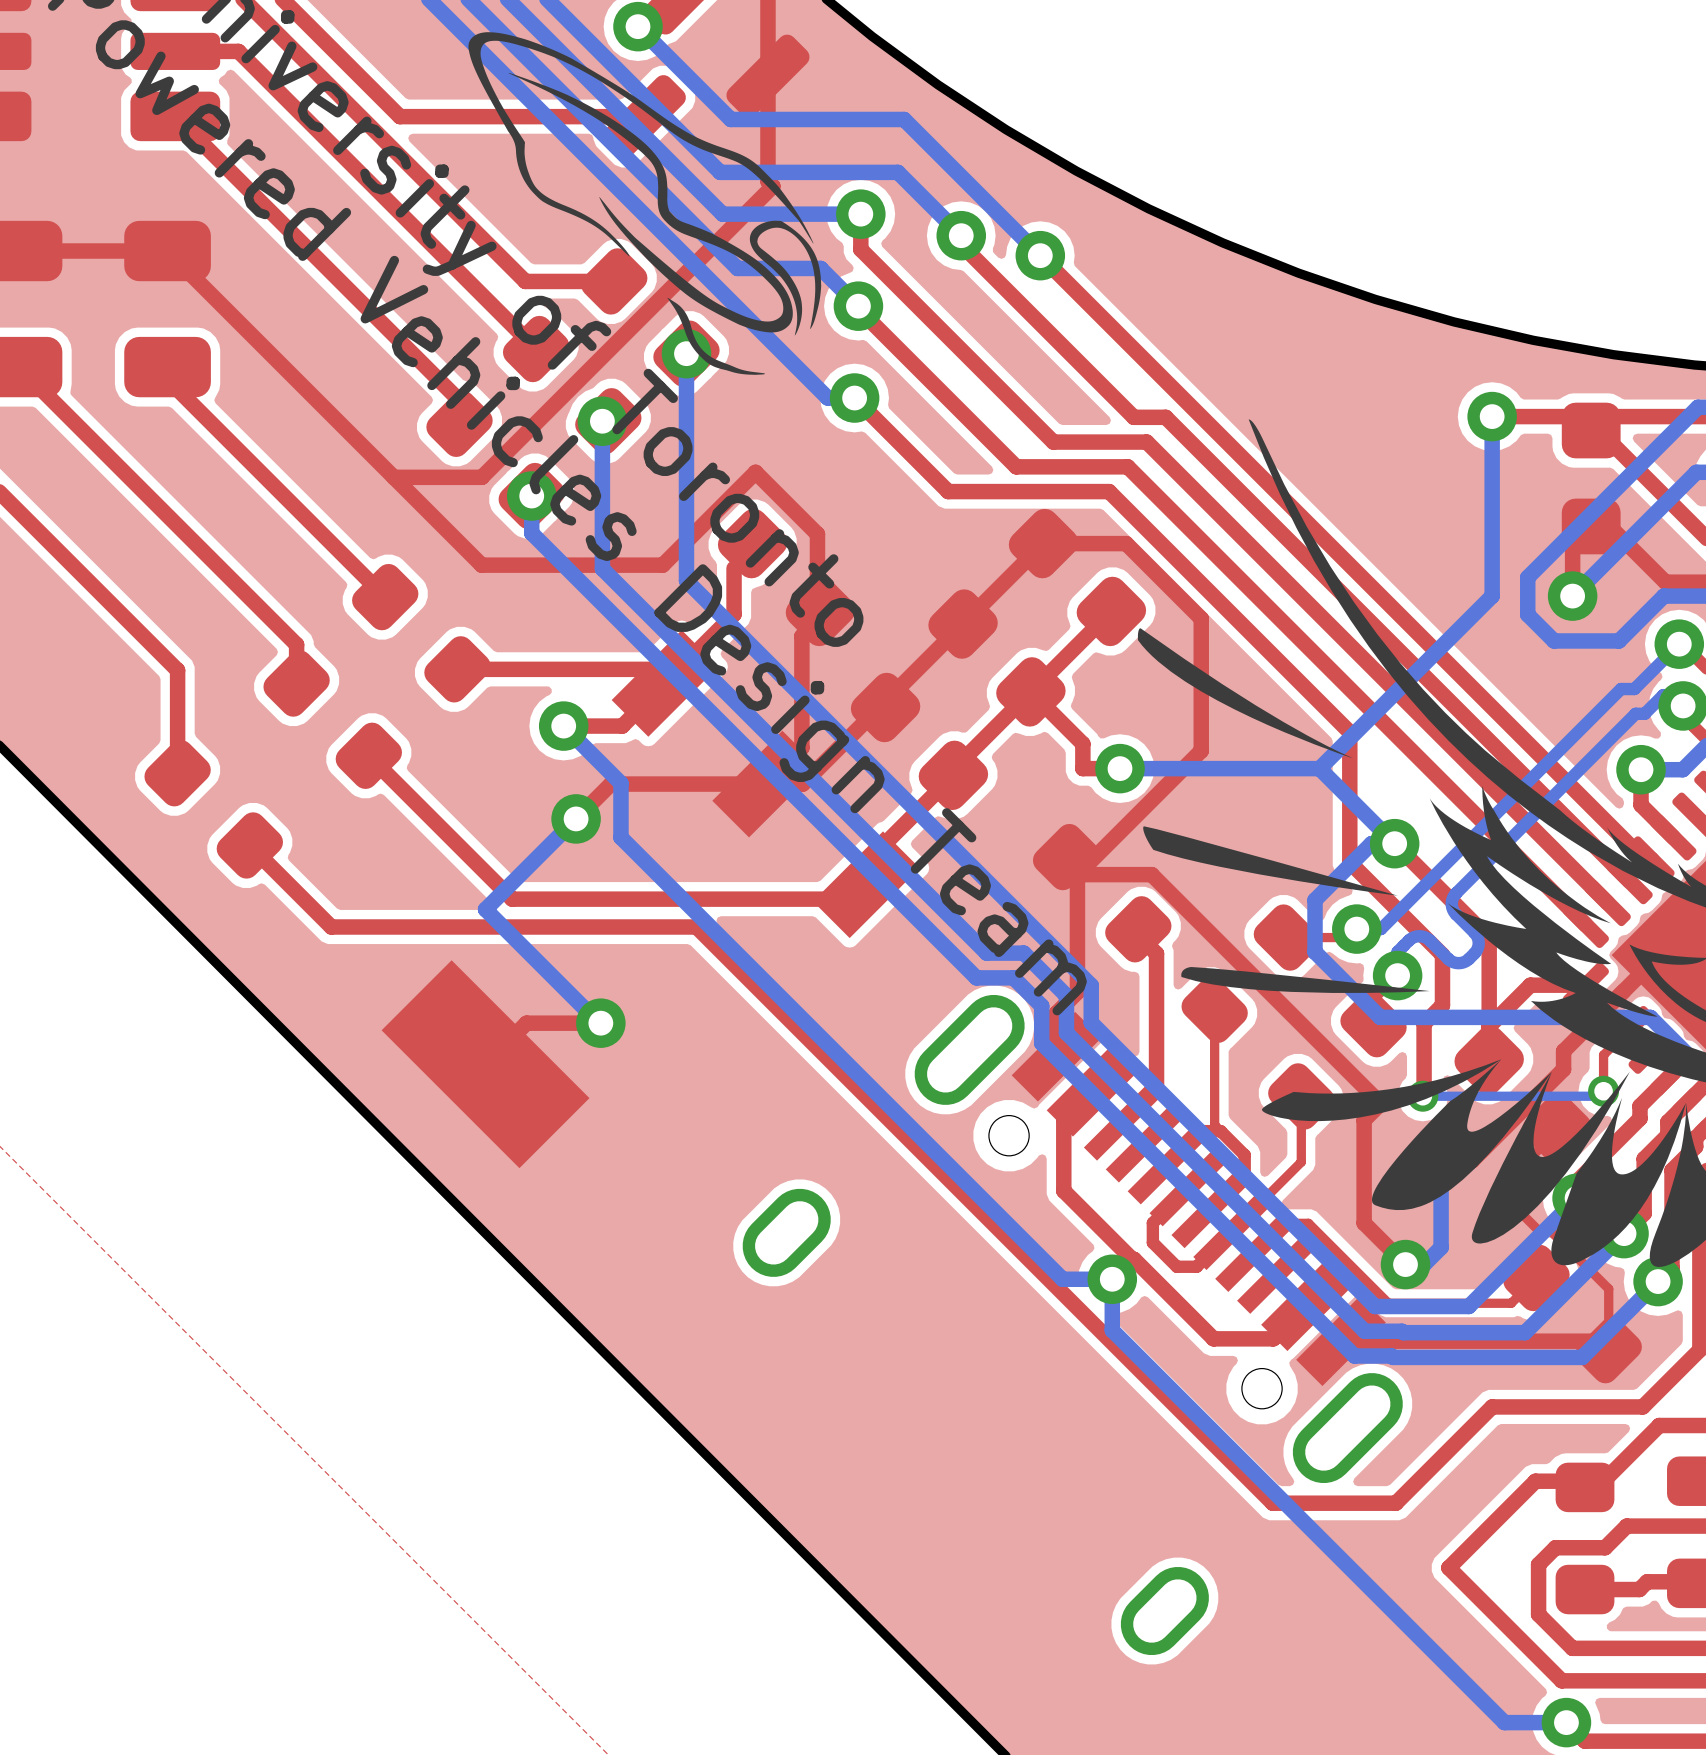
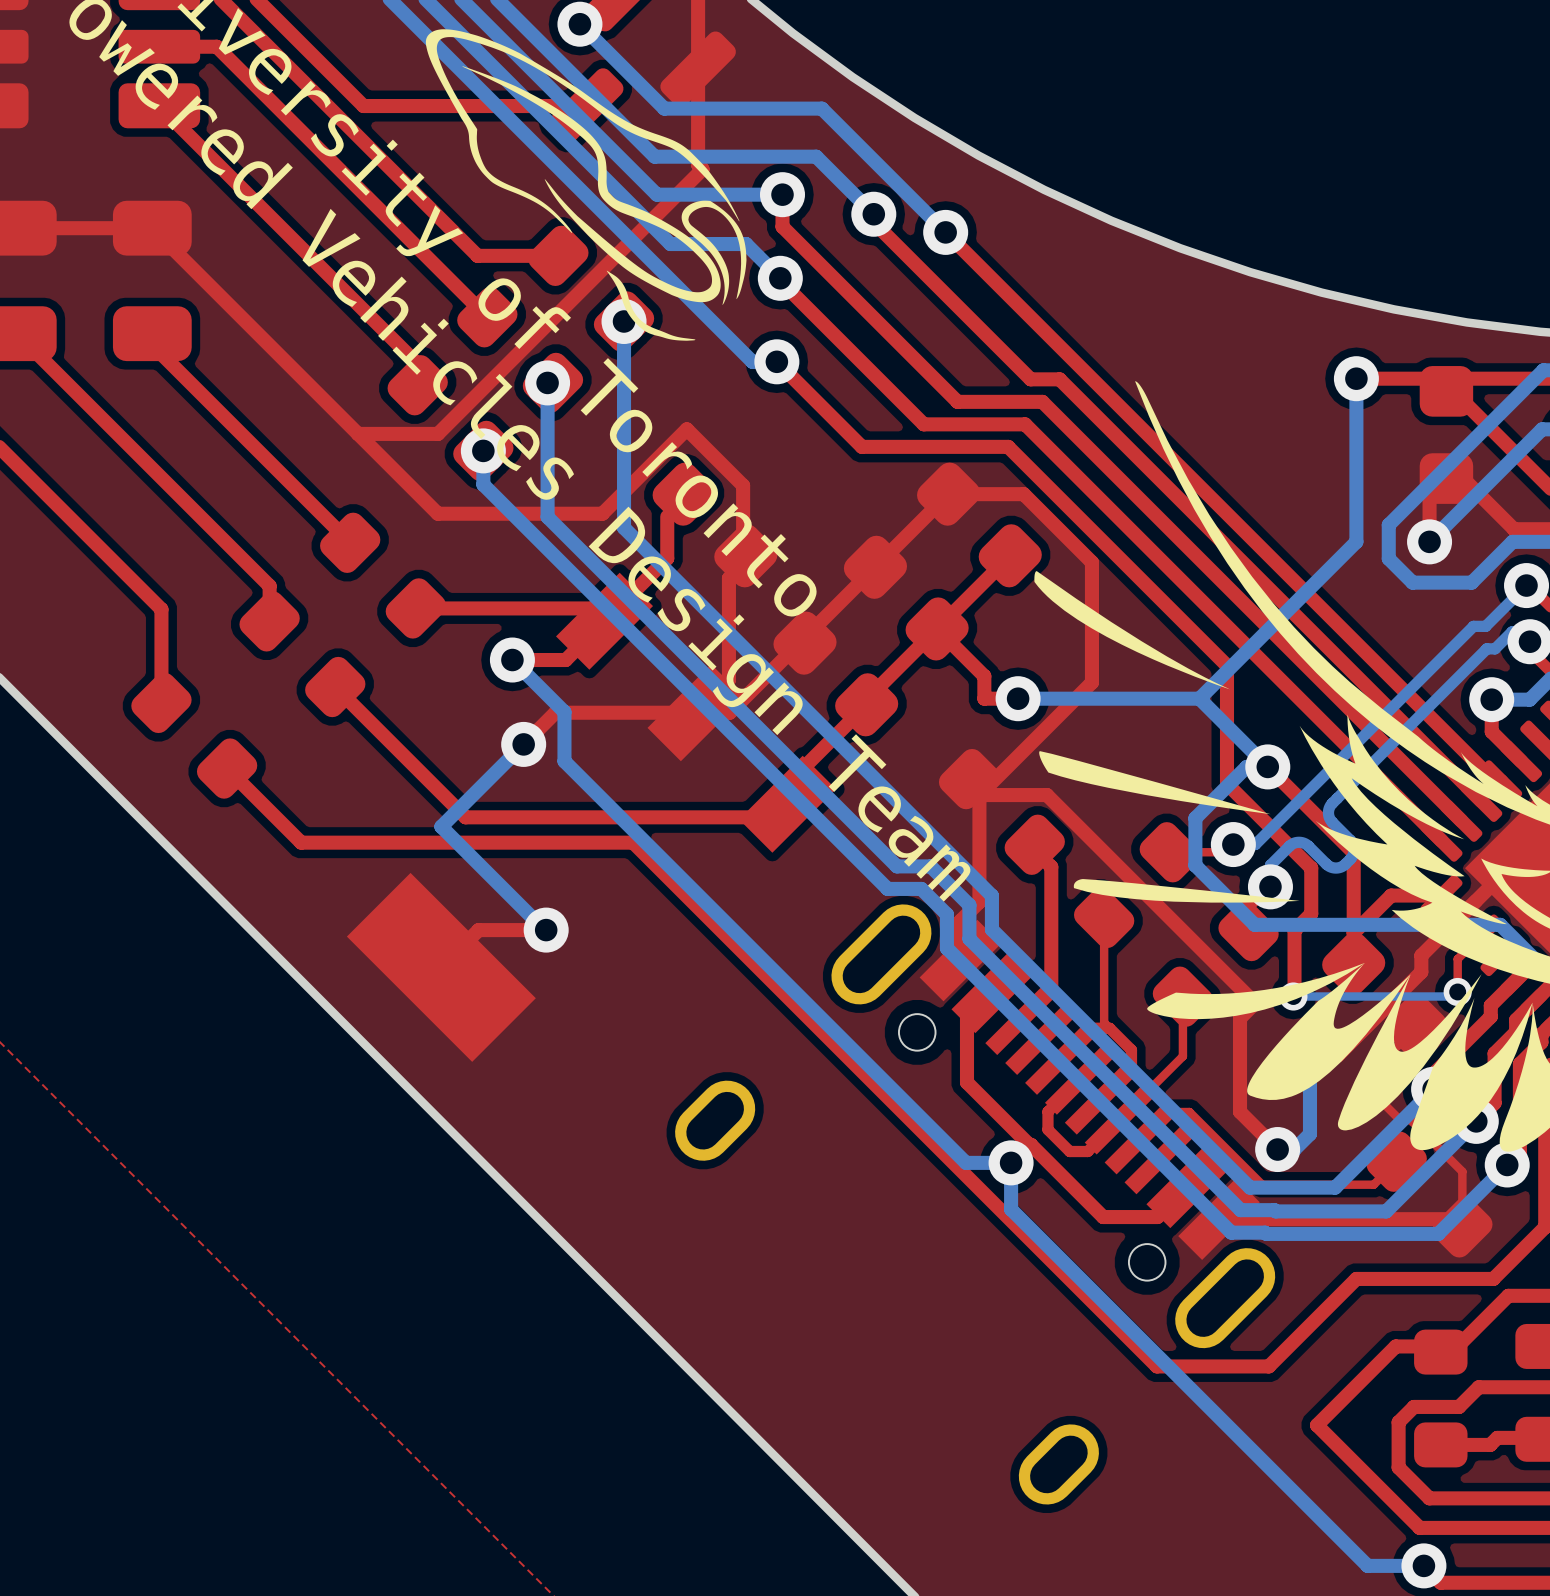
bottom track: (1465, 883) (1454, 894) (1451, 903) (1454, 912) (1474, 932) (1478, 939) (1477, 948) (1469, 958) (1460, 963) (1452, 961) (1423, 936) (1415, 936) (1408, 940) -> (1332, 803) (1328, 809) (1329, 818) (1351, 841) (1353, 846) (1352, 855) (1345, 864) (1338, 867) (1330, 866) (1307, 845) (1300, 842) (1291, 844) (1280, 855)

